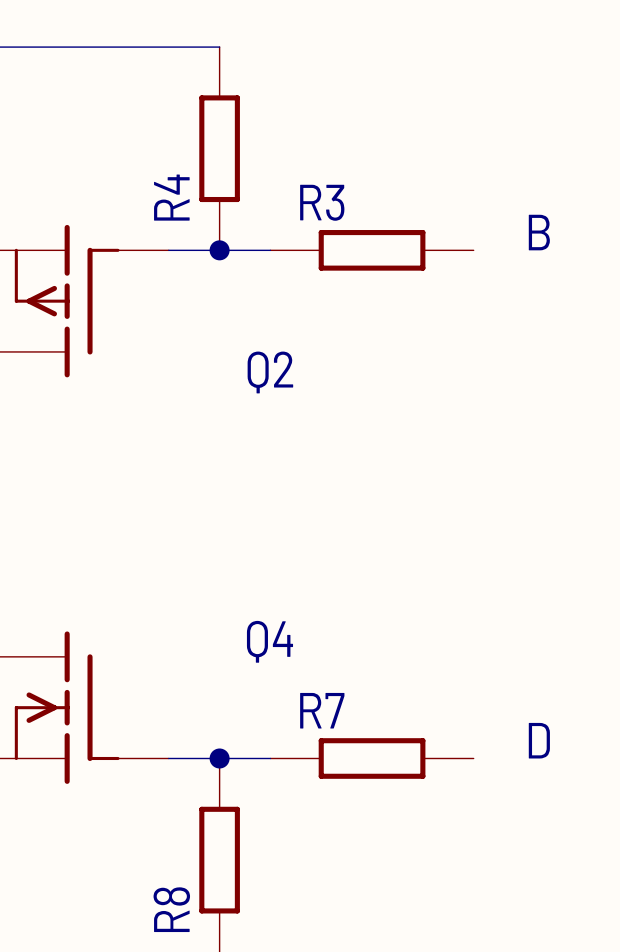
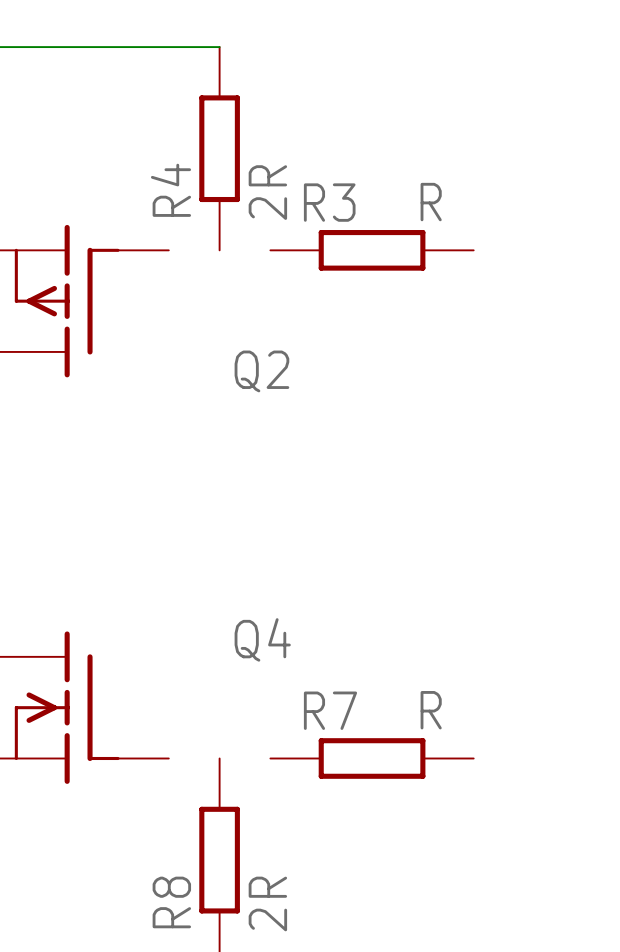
R4 value: none -> 2R (267, 192)
R3 value: none -> R (431, 202)
text: B (539, 232) -> none
wire: (168, 250) (270, 250) -> none
junction: (219, 250) -> none
R7 value: none -> R (431, 710)
text: D (539, 740) -> none
wire: (168, 758) (270, 758) -> none
junction: (219, 758) -> none
R8 value: none -> 2R (267, 903)

